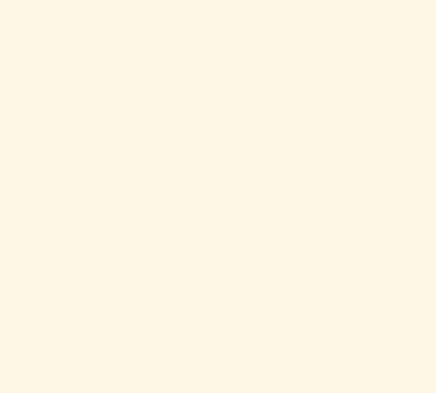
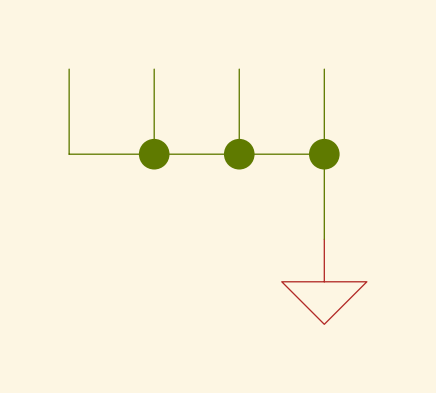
wire: none -> (69, 69) (69, 154) (324, 154)
wire: none -> (154, 69) (154, 154)
wire: none -> (239, 69) (239, 154)
wire: none -> (324, 69) (324, 239)
junction: none -> (154, 154)
junction: none -> (239, 154)
junction: none -> (324, 154)
power symbol: none -> (324, 281)

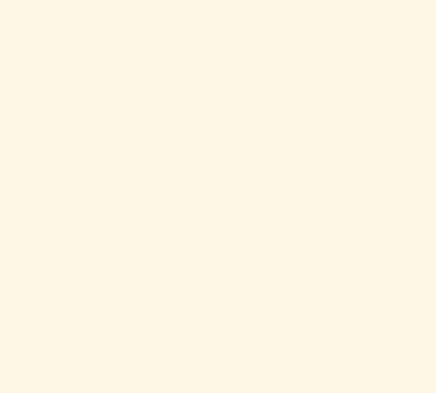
wire: (69, 69) (69, 154) (324, 154) -> none
wire: (154, 69) (154, 154) -> none
wire: (239, 69) (239, 154) -> none
wire: (324, 69) (324, 239) -> none
junction: (154, 154) -> none
junction: (239, 154) -> none
junction: (324, 154) -> none
power symbol: (324, 281) -> none

